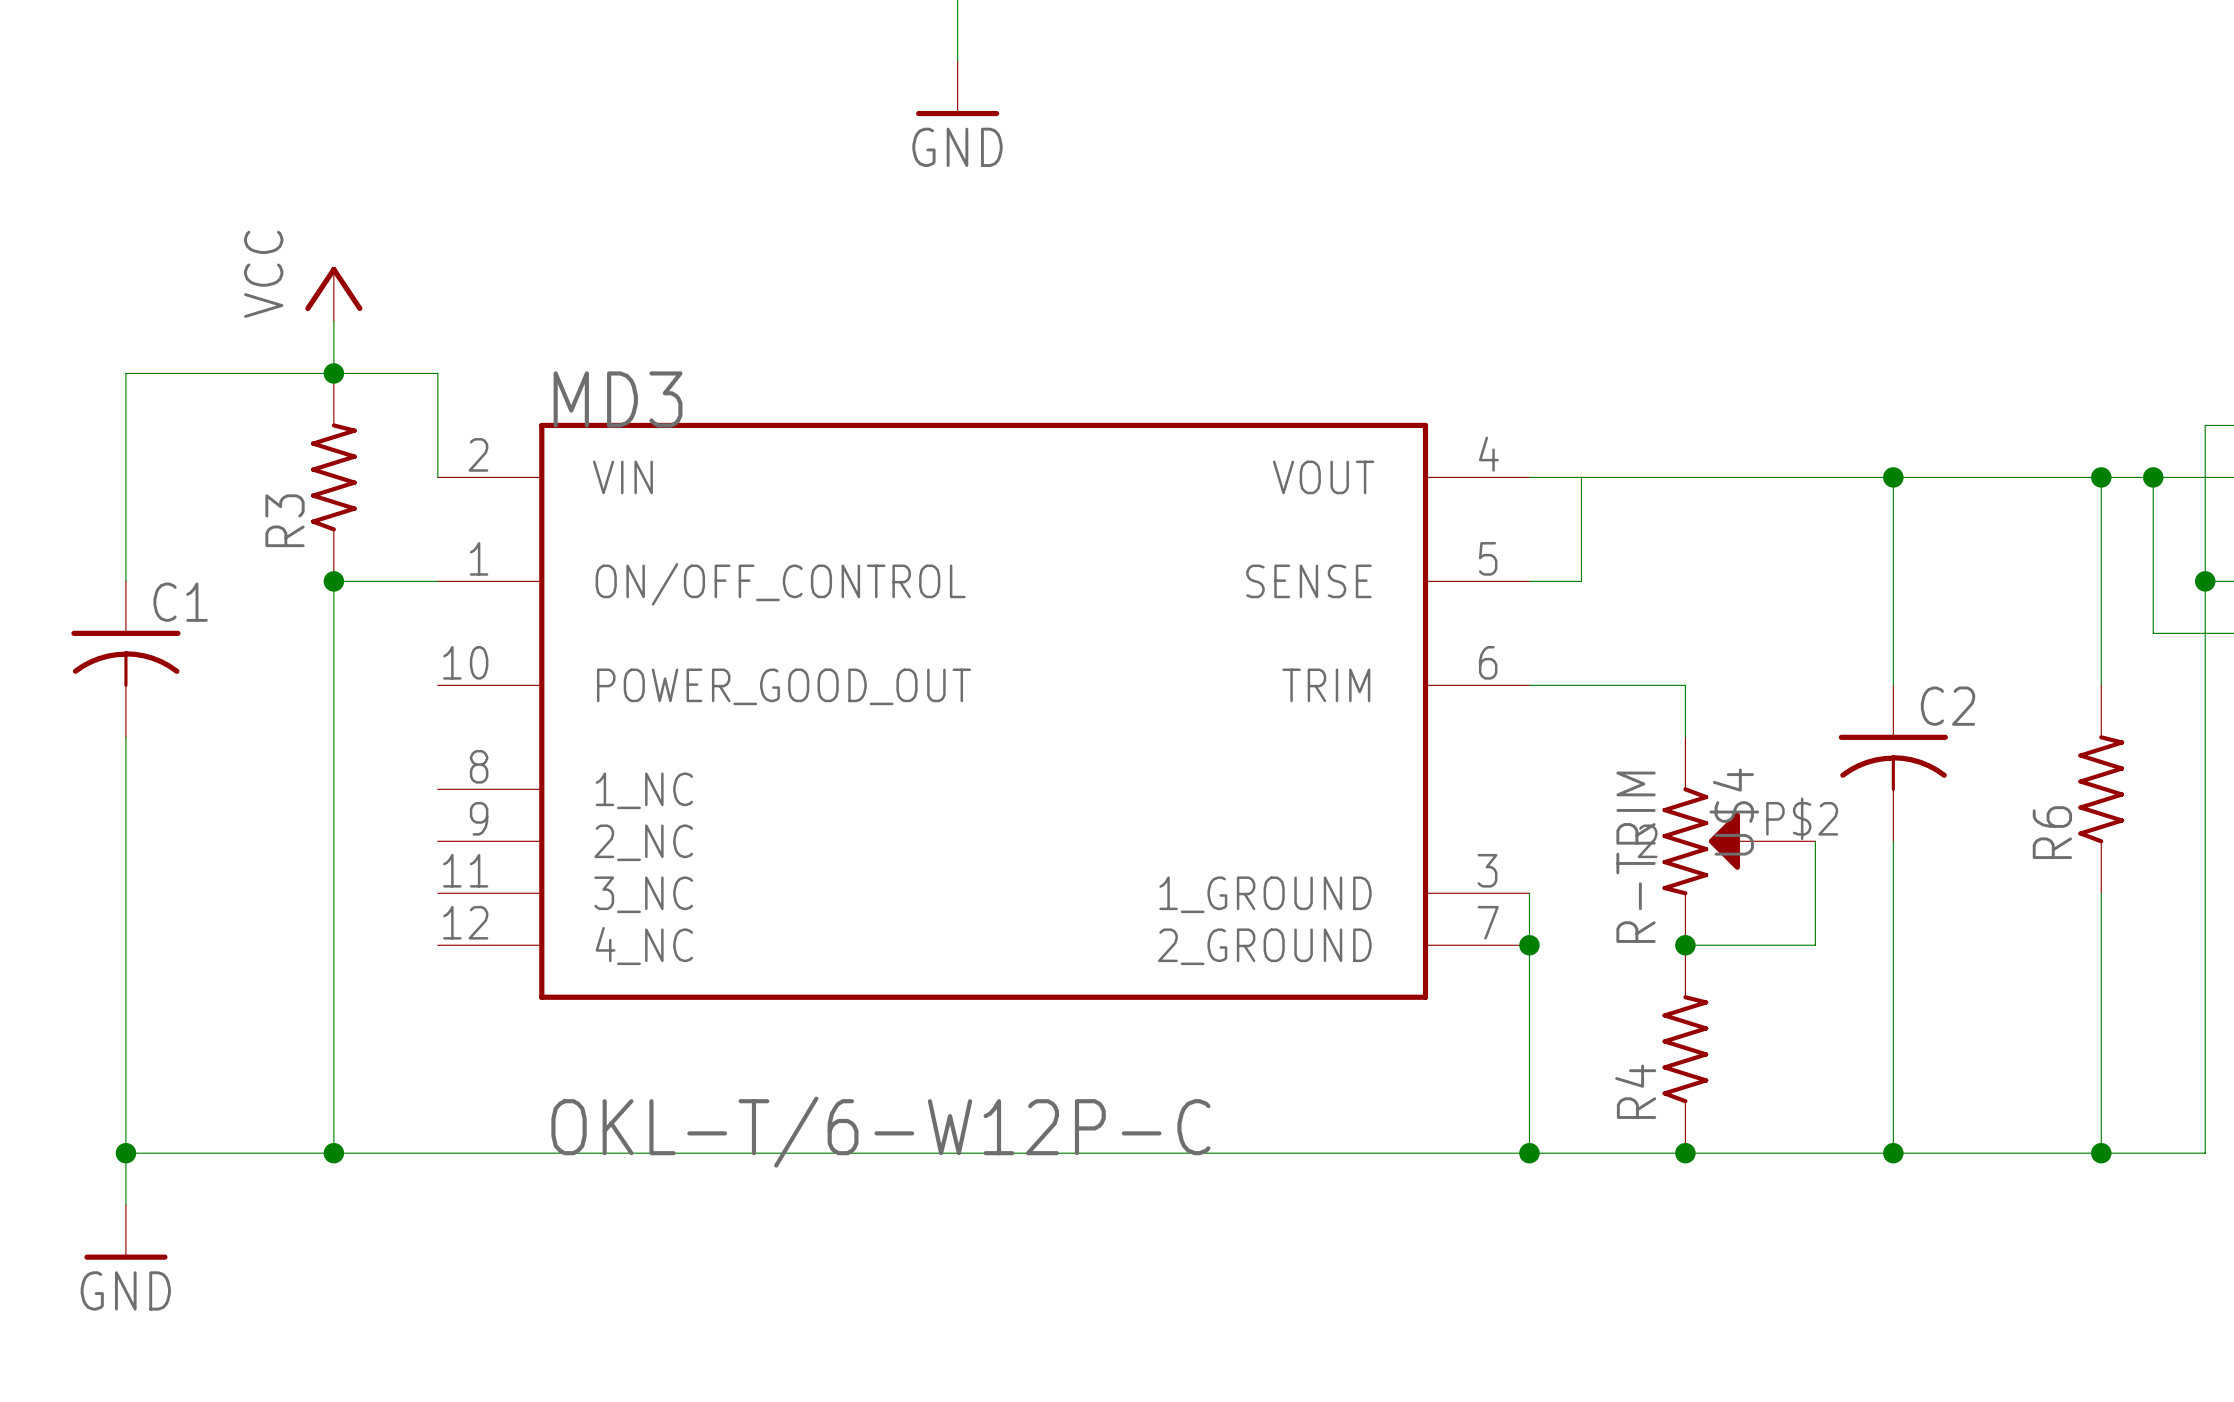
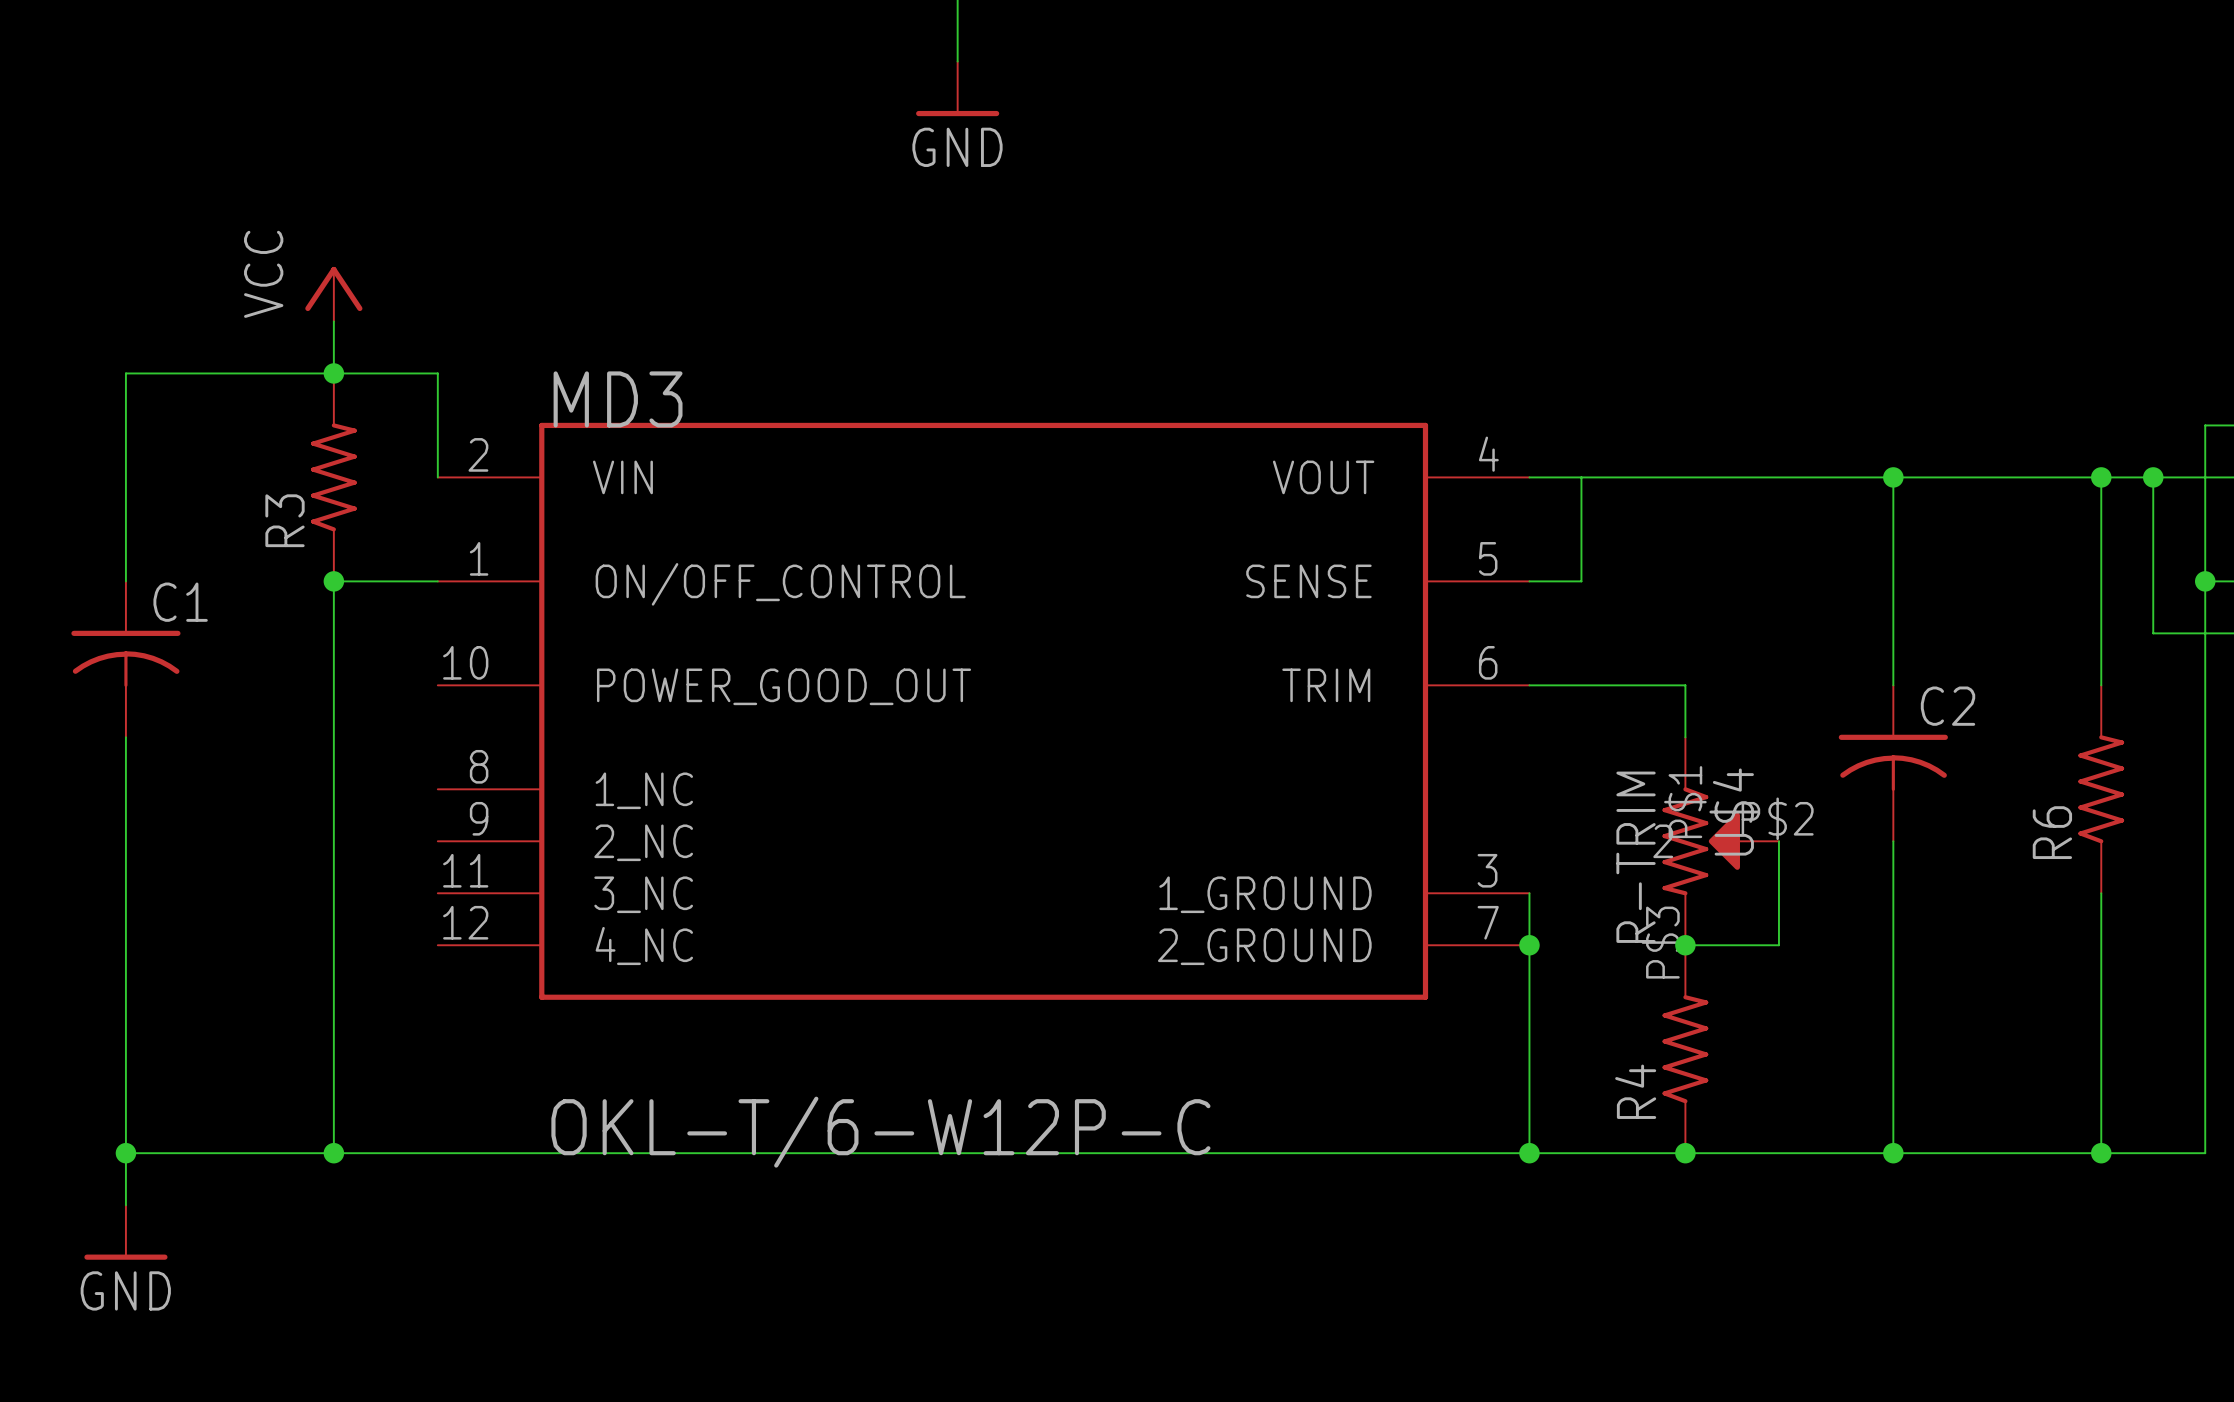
U$4 symbol: [1662, 737, 1816, 946] -> [1662, 737, 1779, 946]
wire: (1815, 841) (1815, 945) (1778, 945) -> (1778, 841) (1778, 945)

